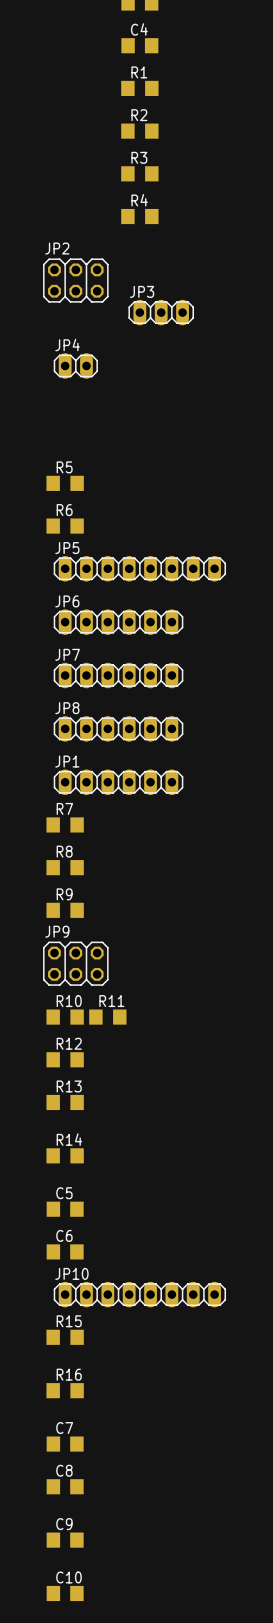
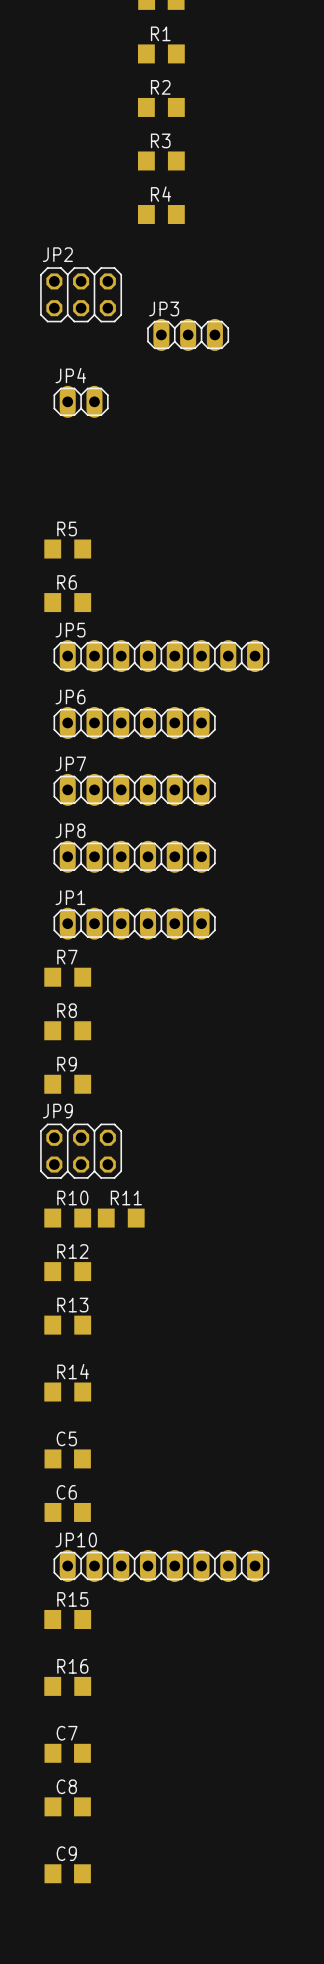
C10: (65, 1593) -> none

